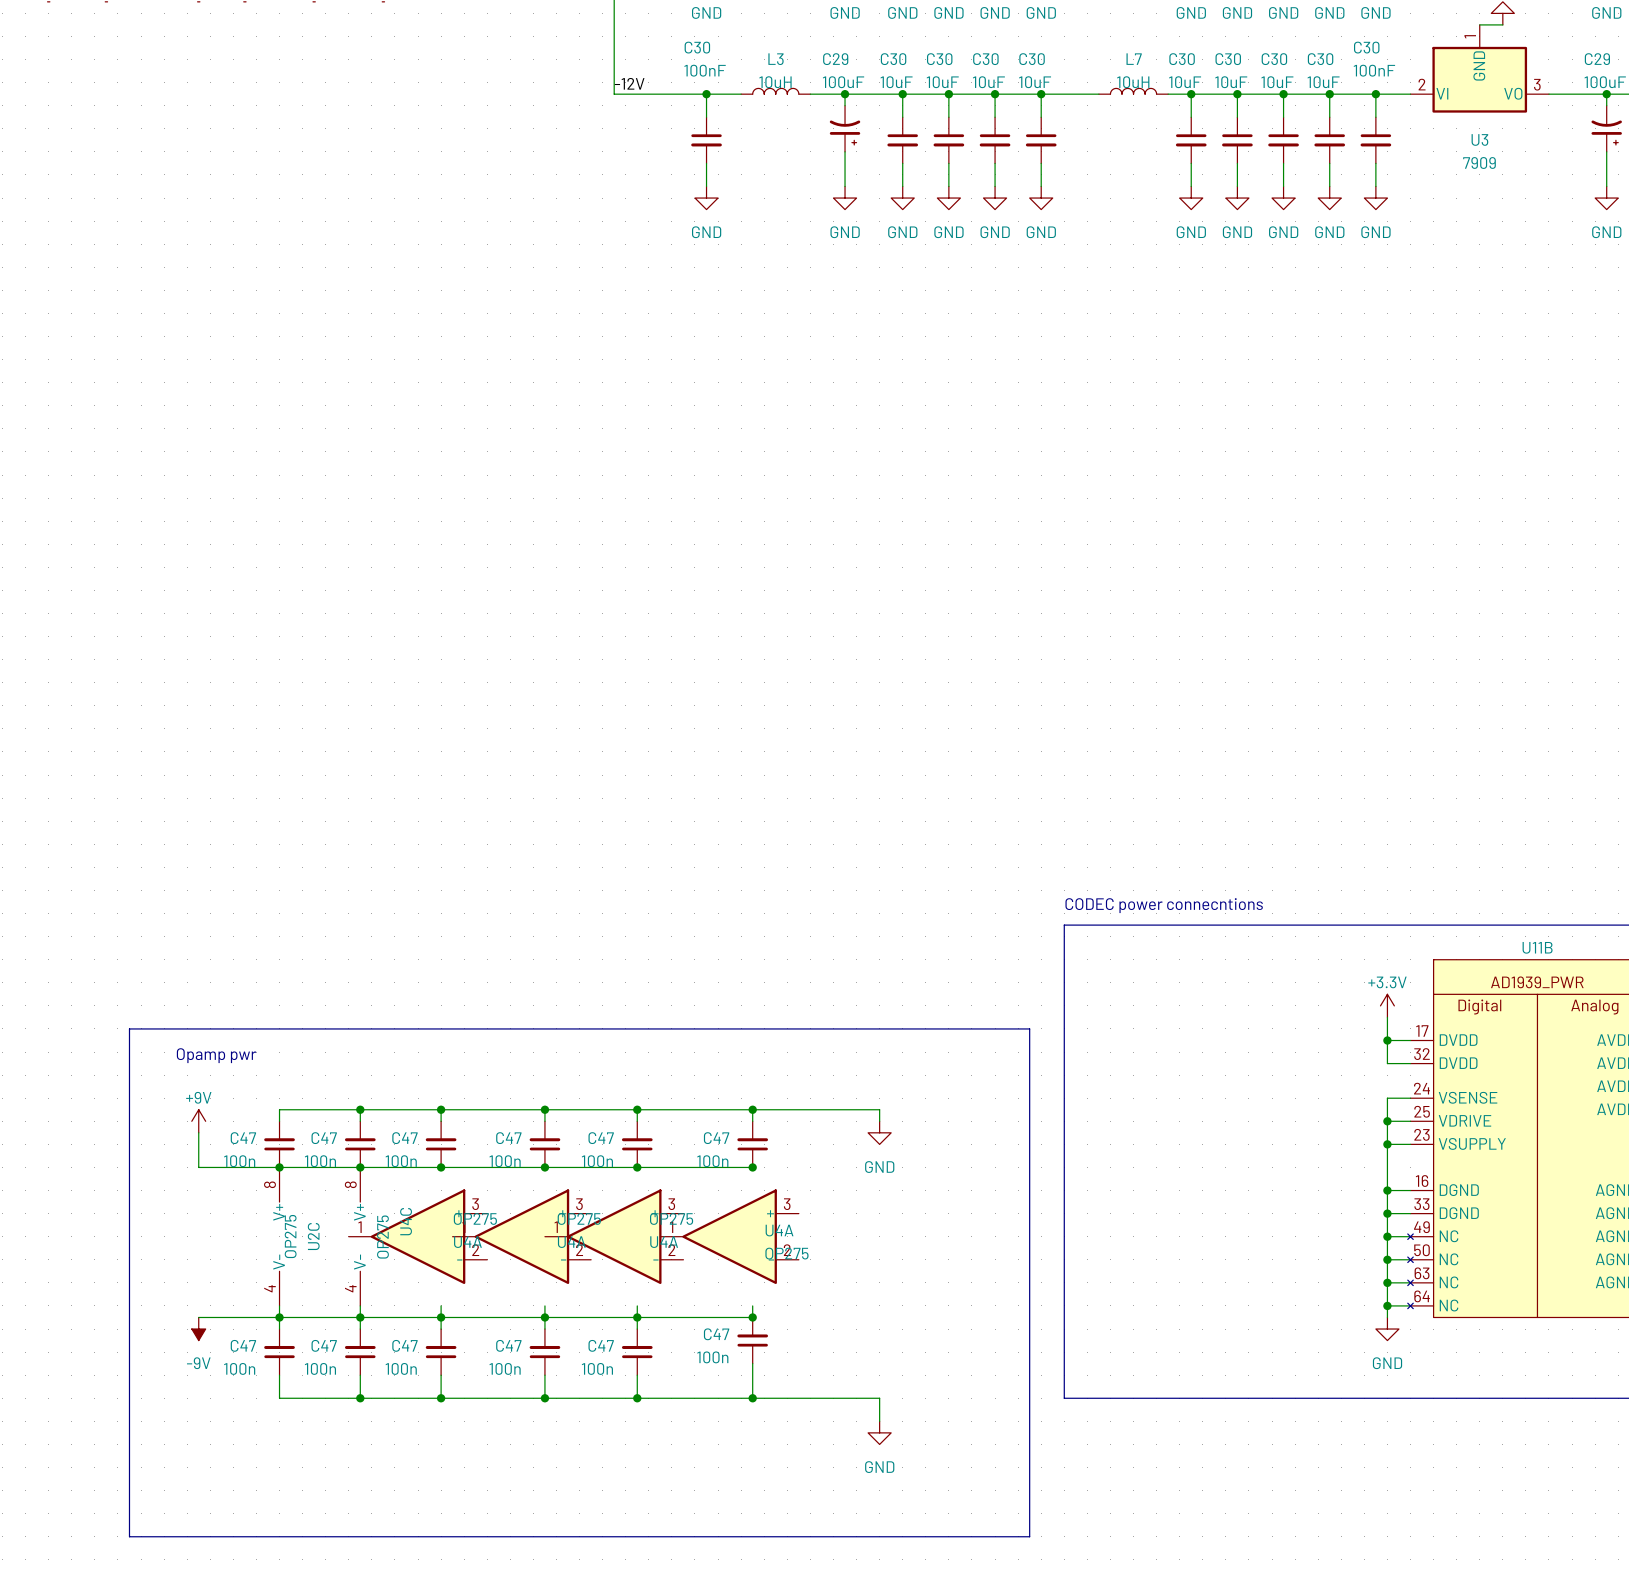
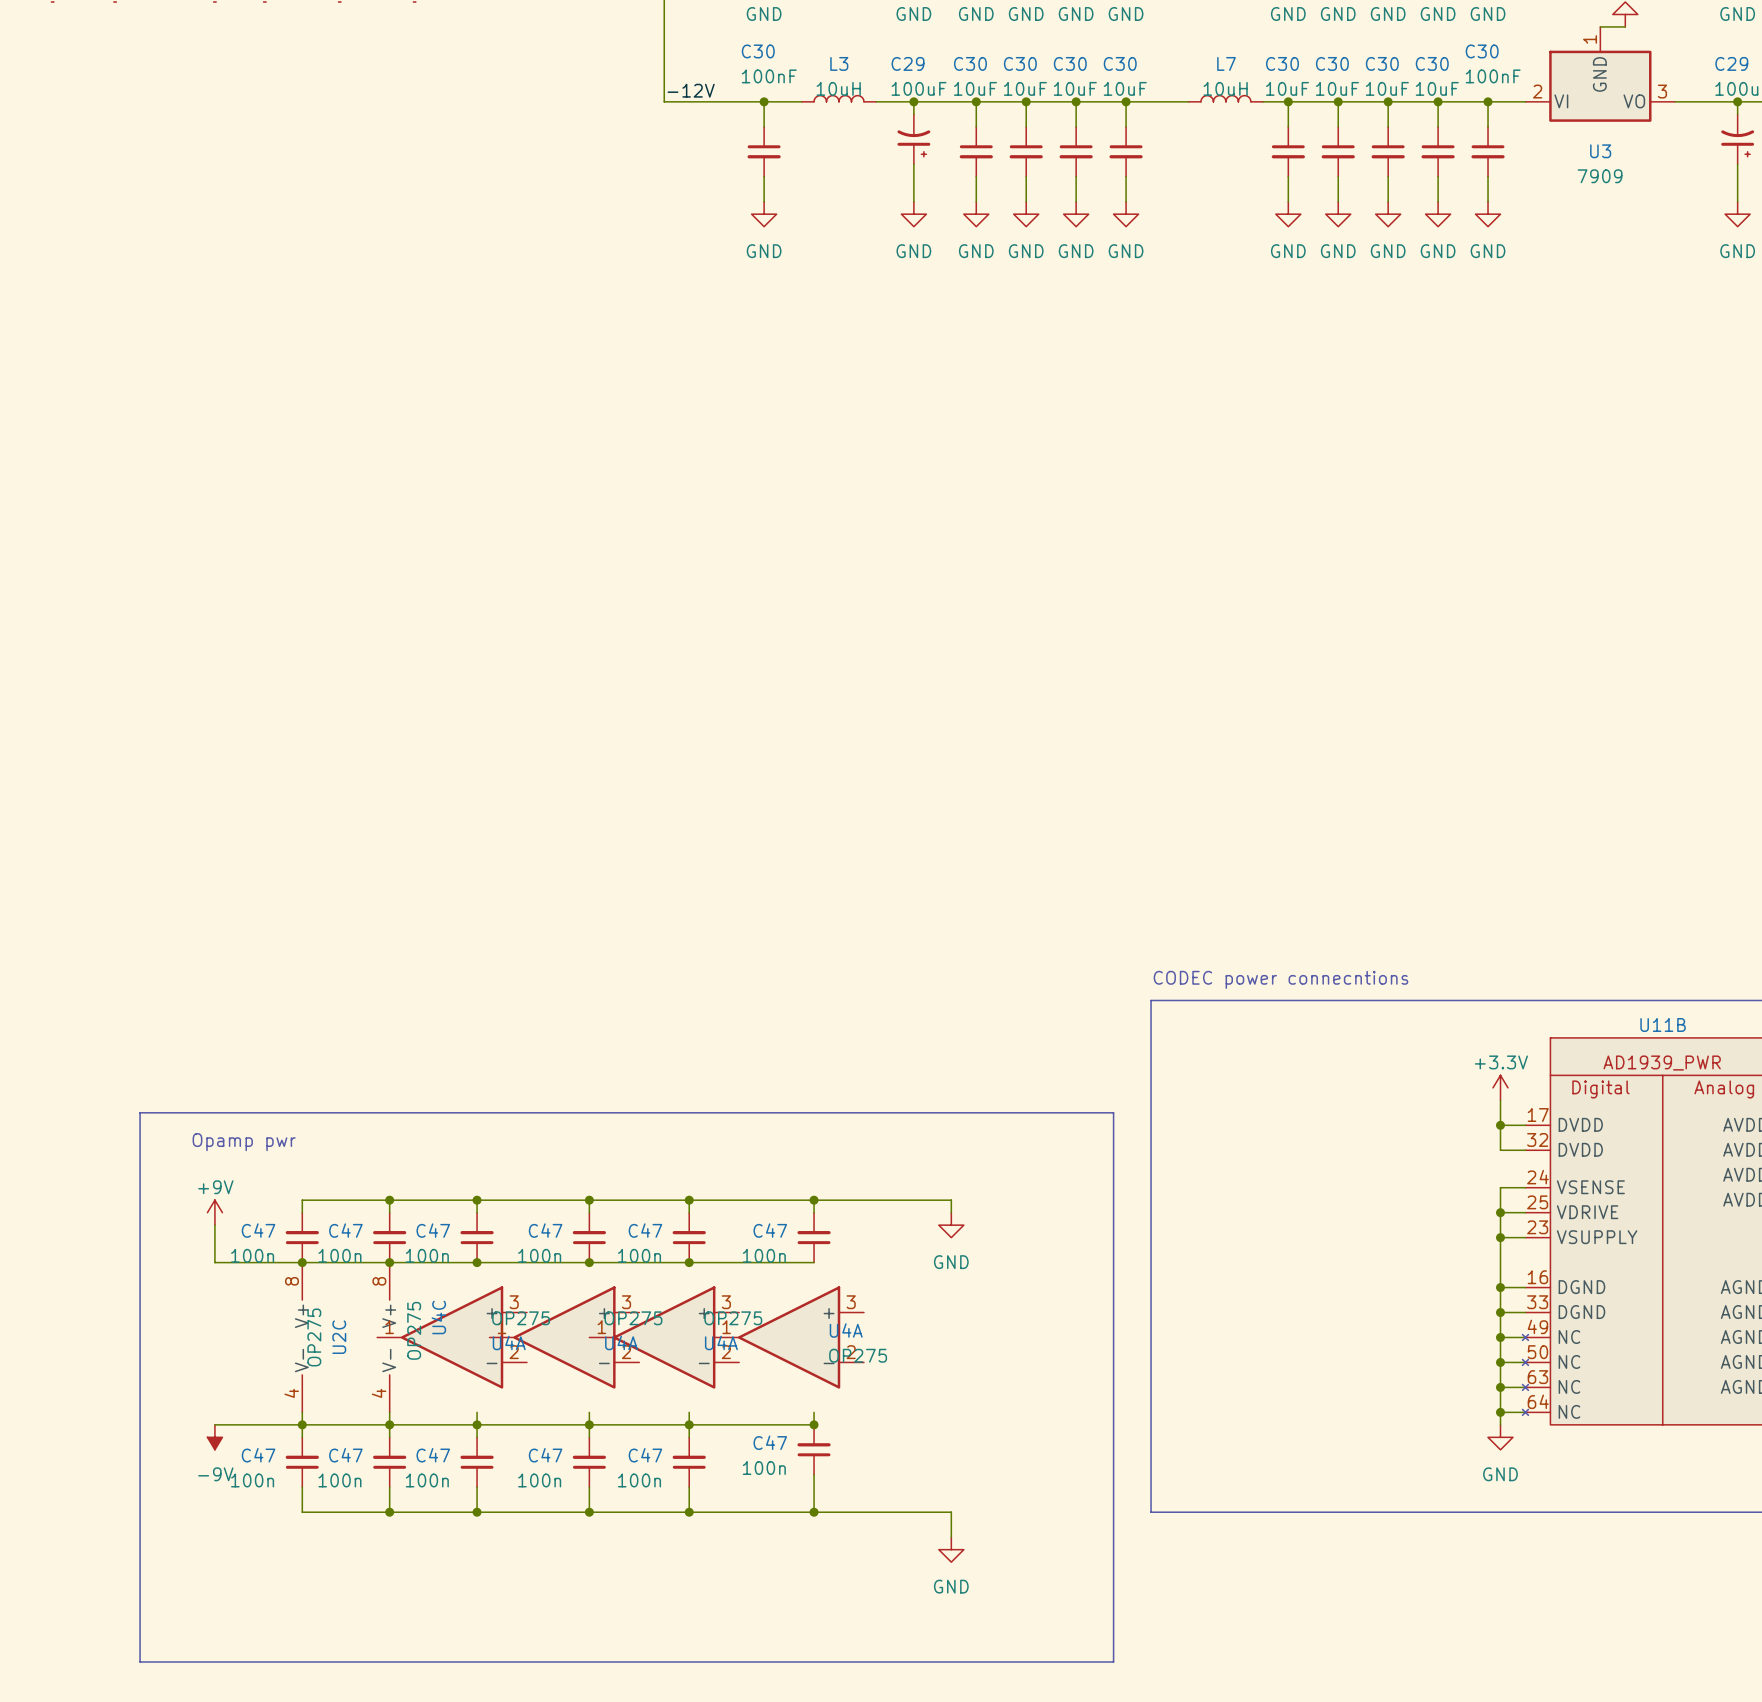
junction: (752, 1167) -> none

